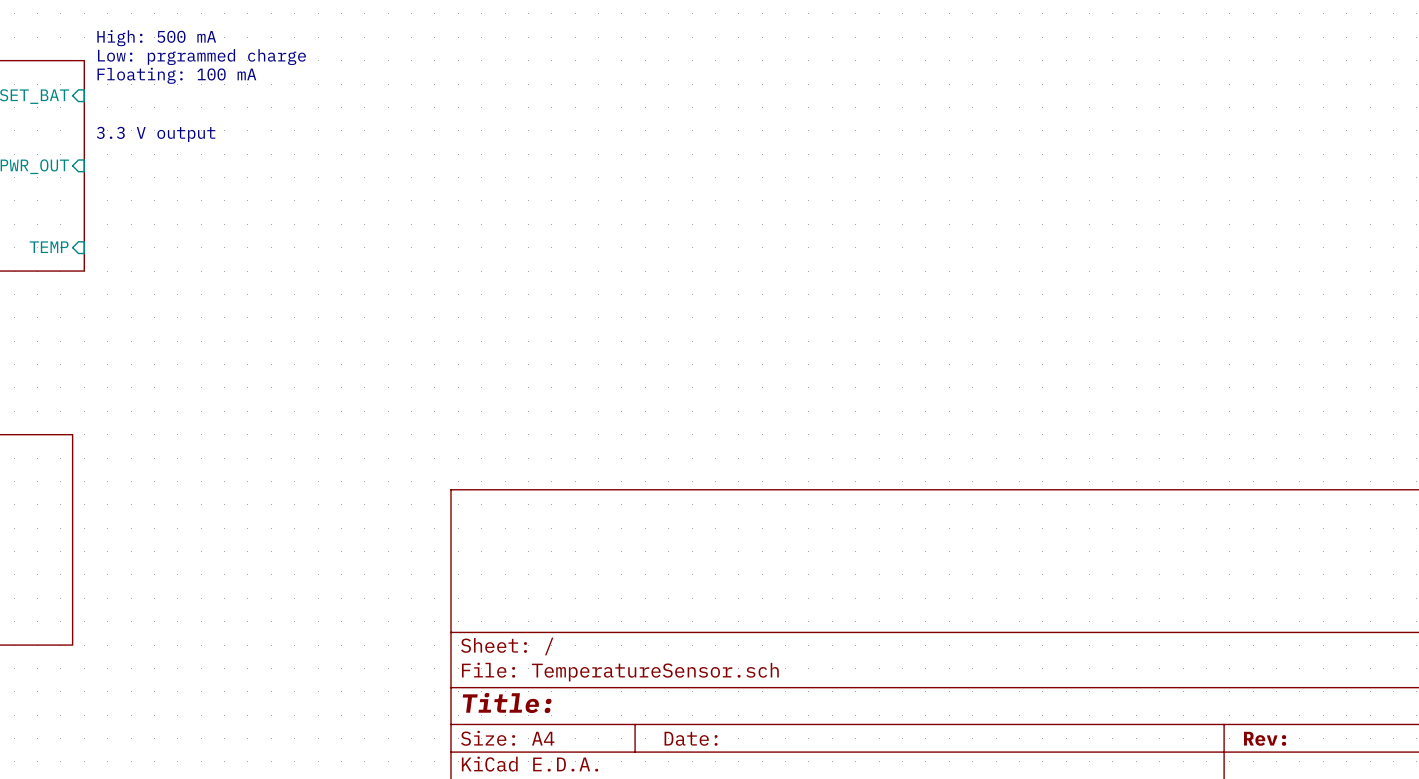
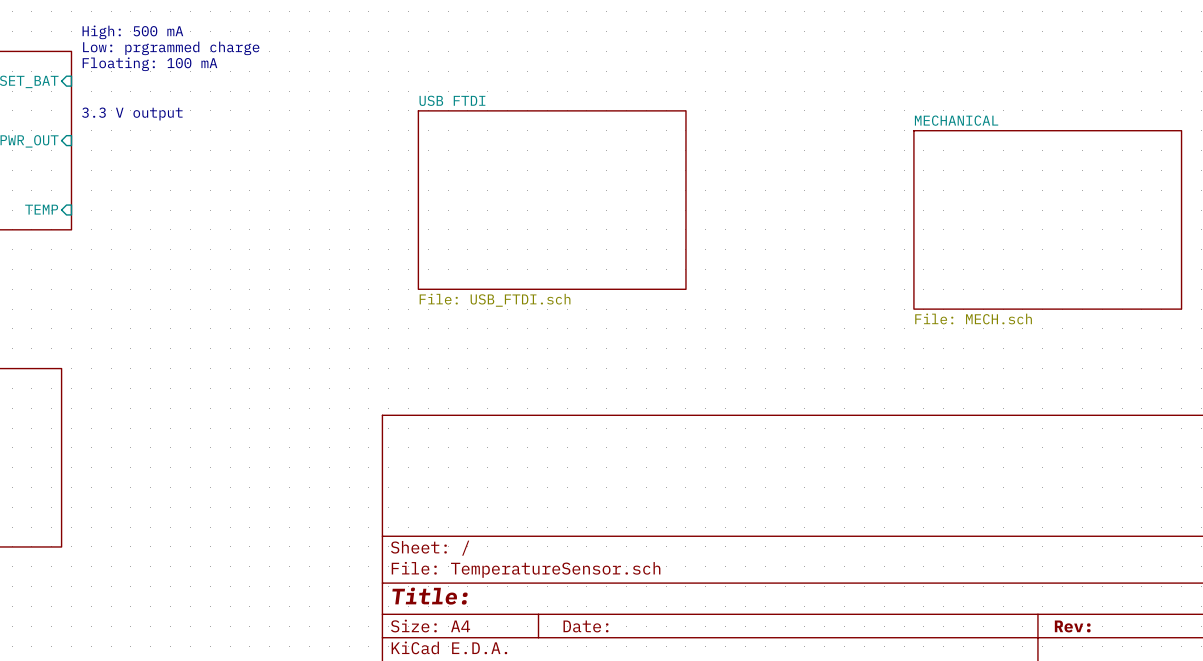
sheet USB FTDI: none -> File: USB_FTDI.sch (552, 200)
sheet MECHANICAL: none -> File: MECH.sch (1047, 219)

